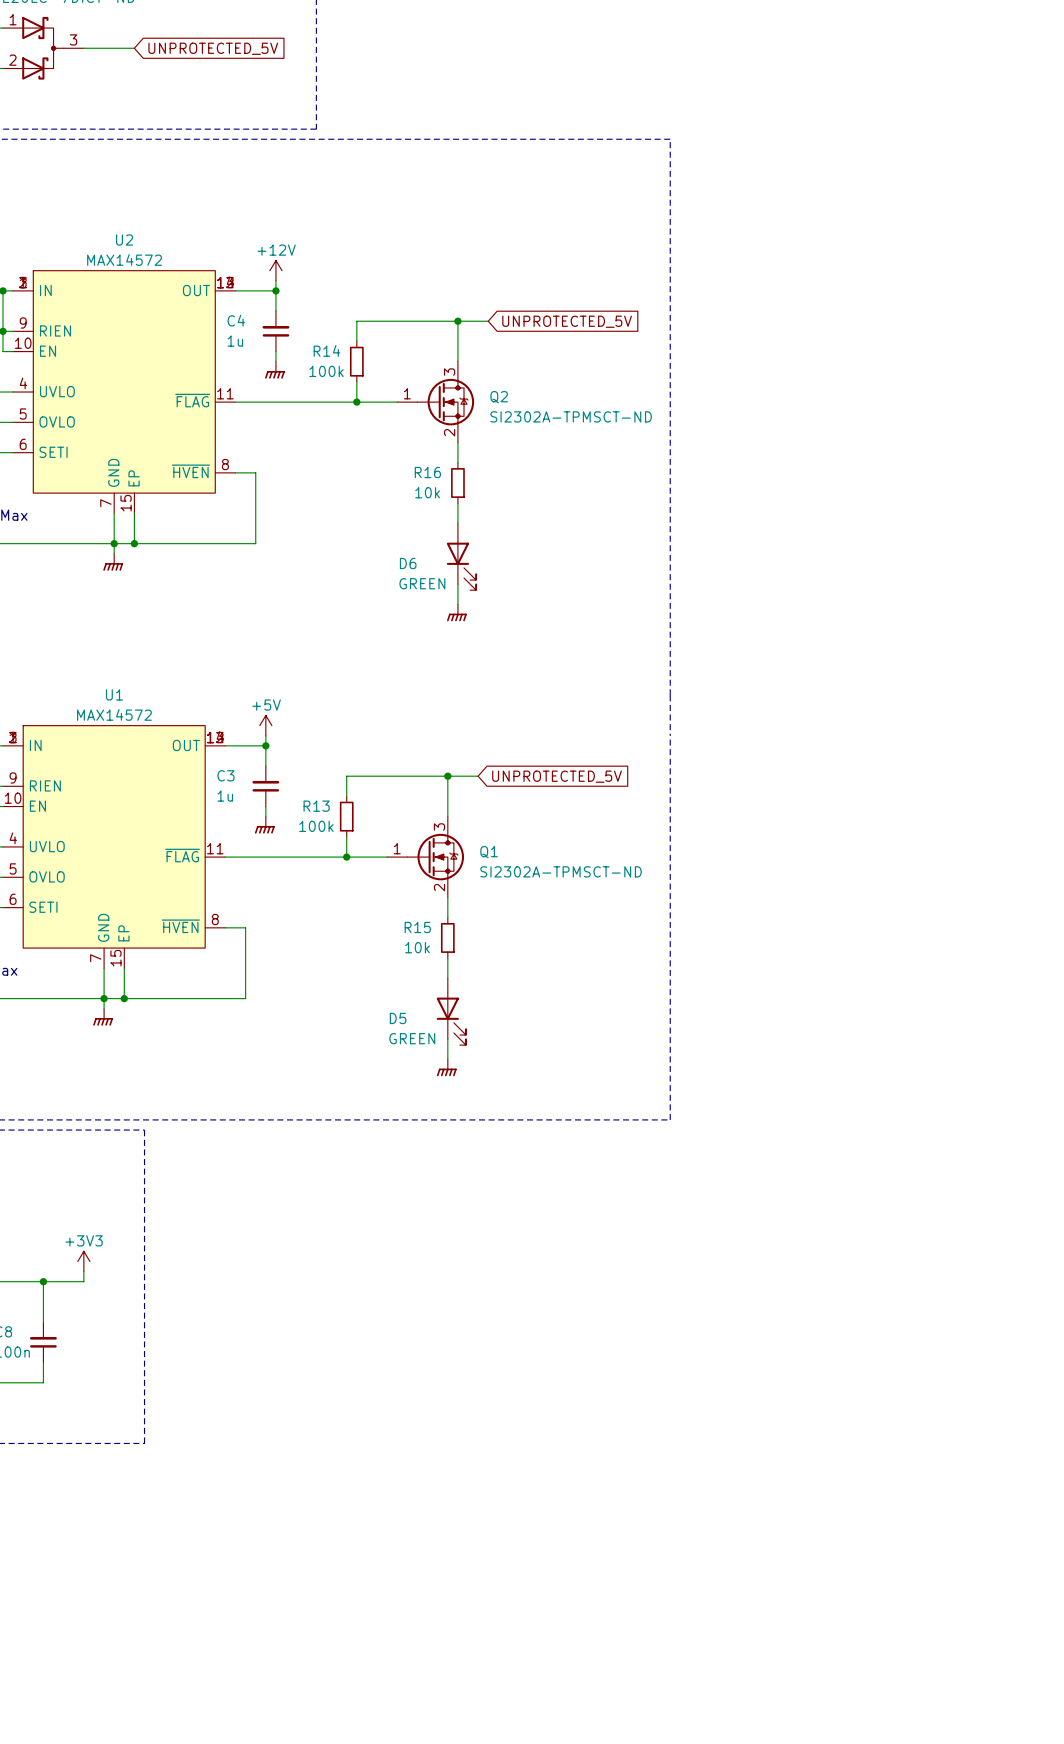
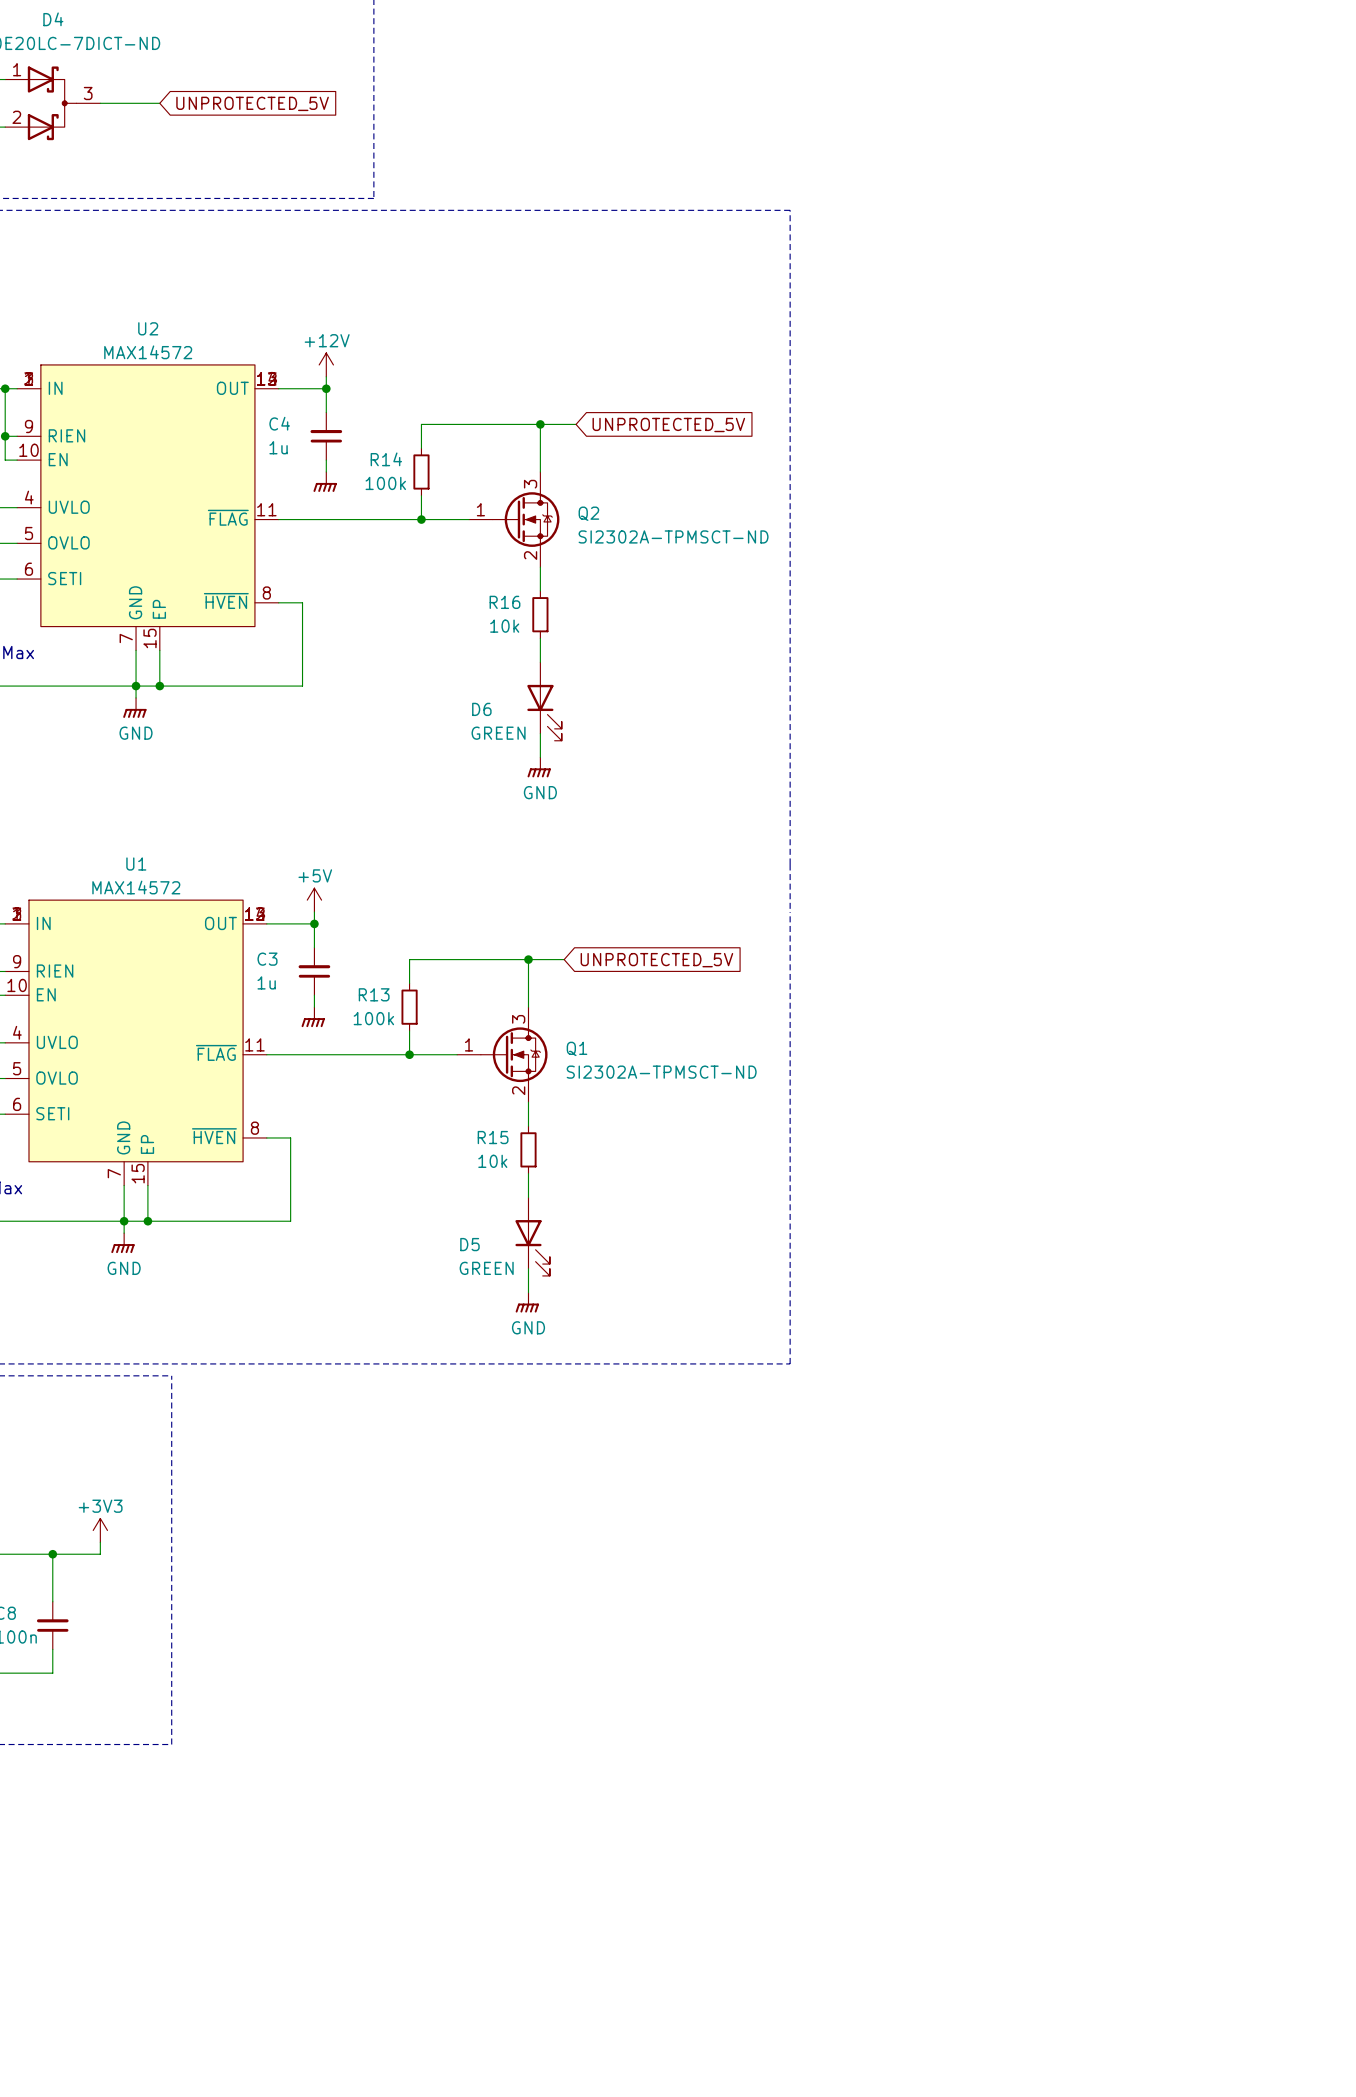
power symbol text: none -> GND (136, 733)
power symbol text: none -> GND (540, 792)
power symbol text: none -> GND (124, 1268)
power symbol text: none -> GND (528, 1327)

